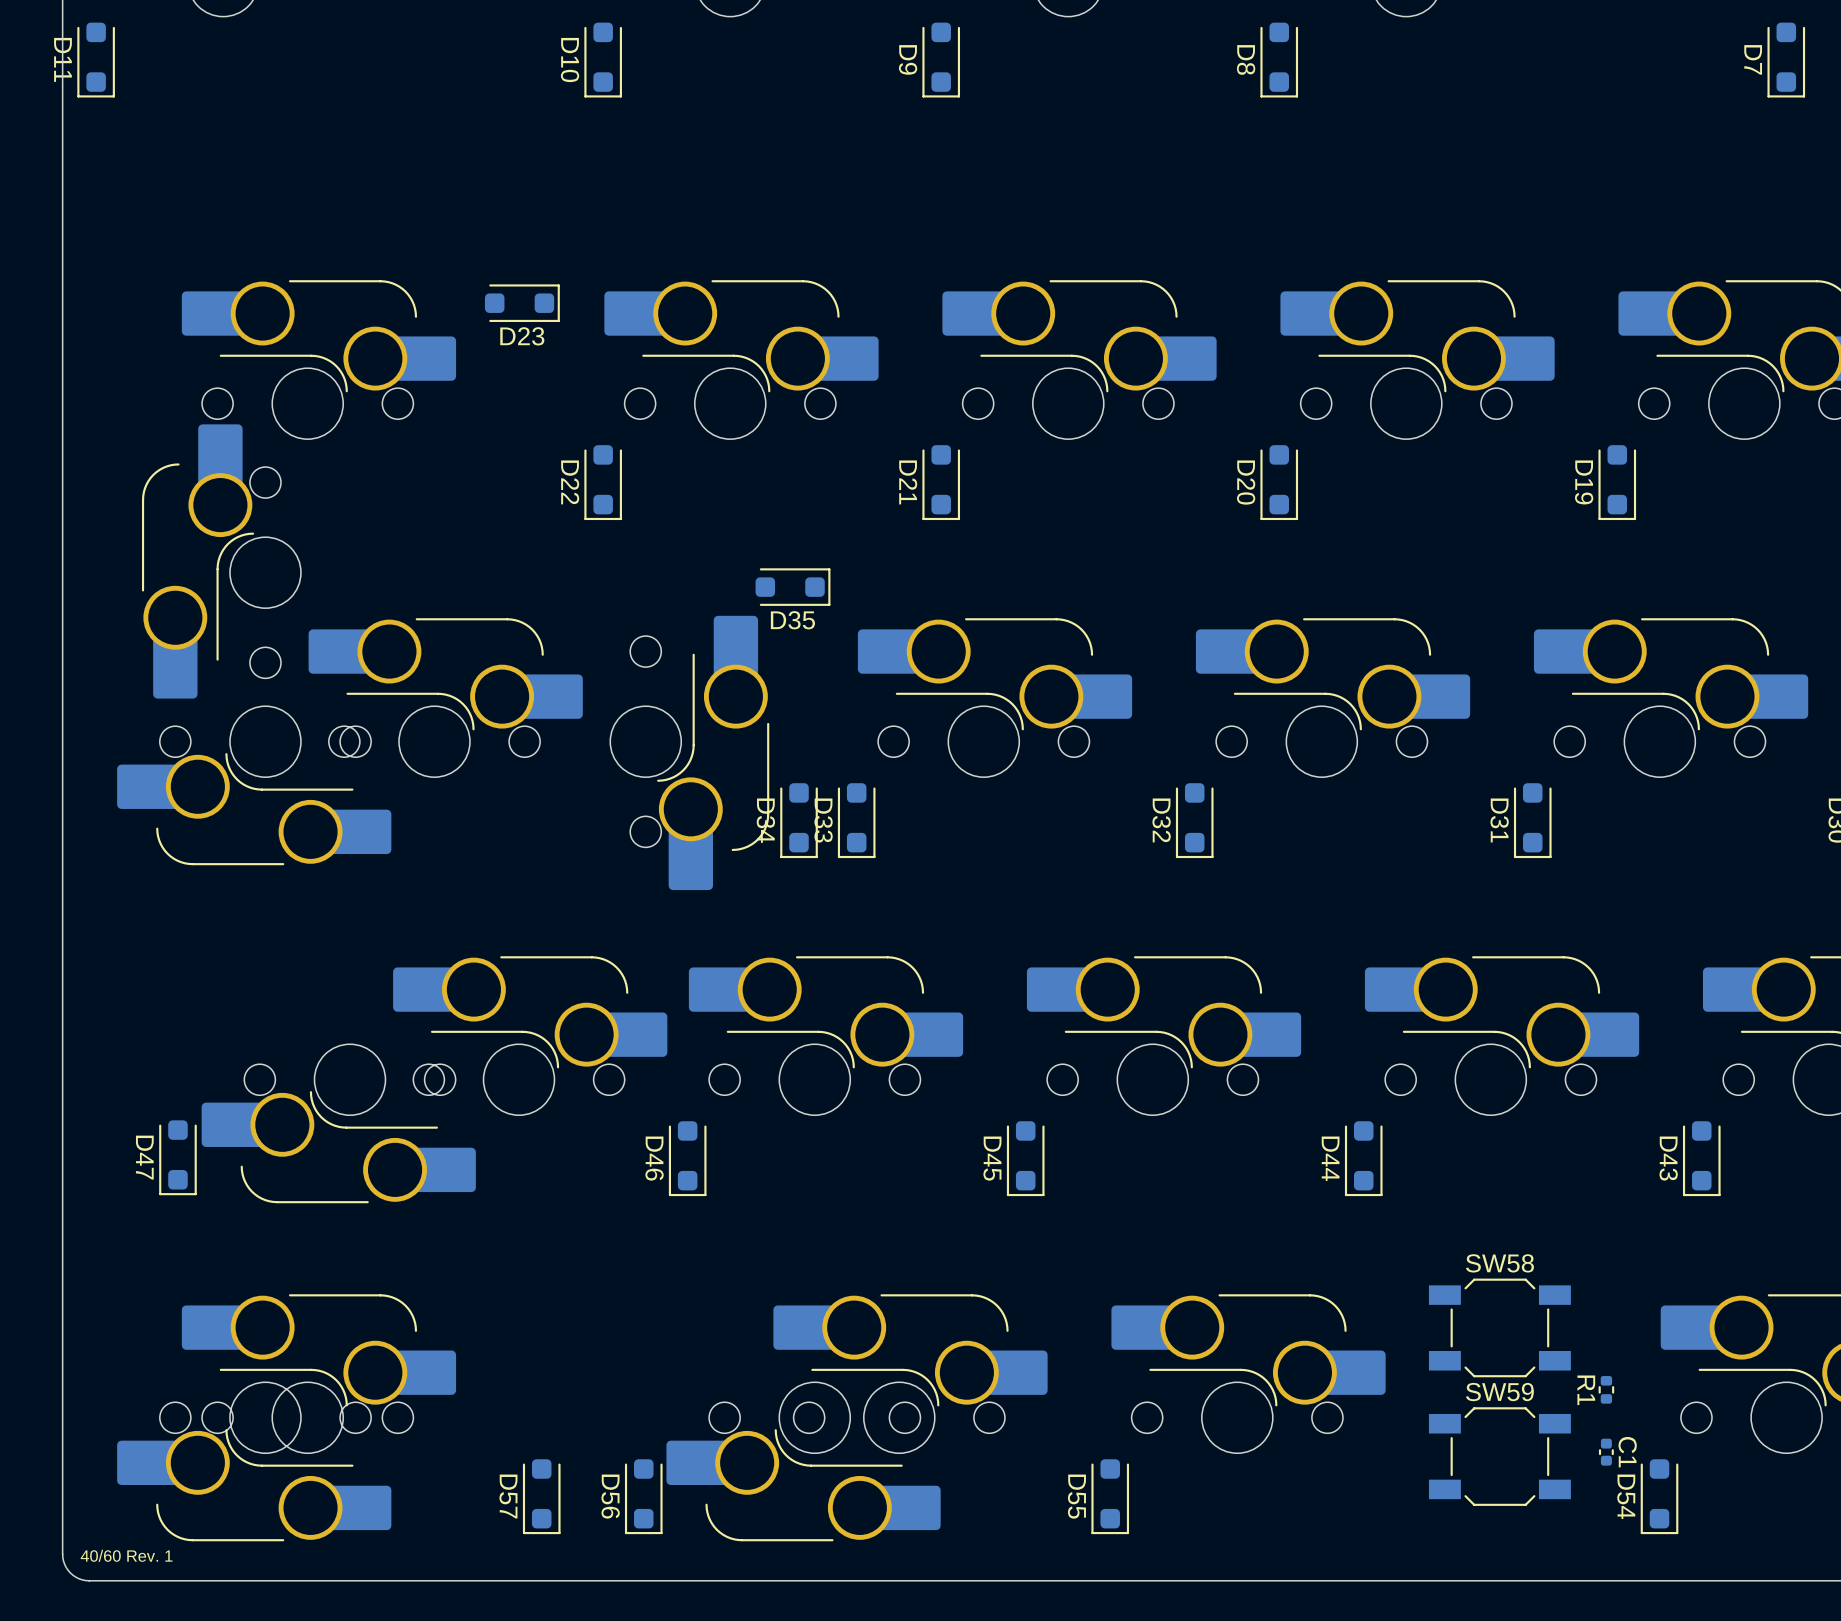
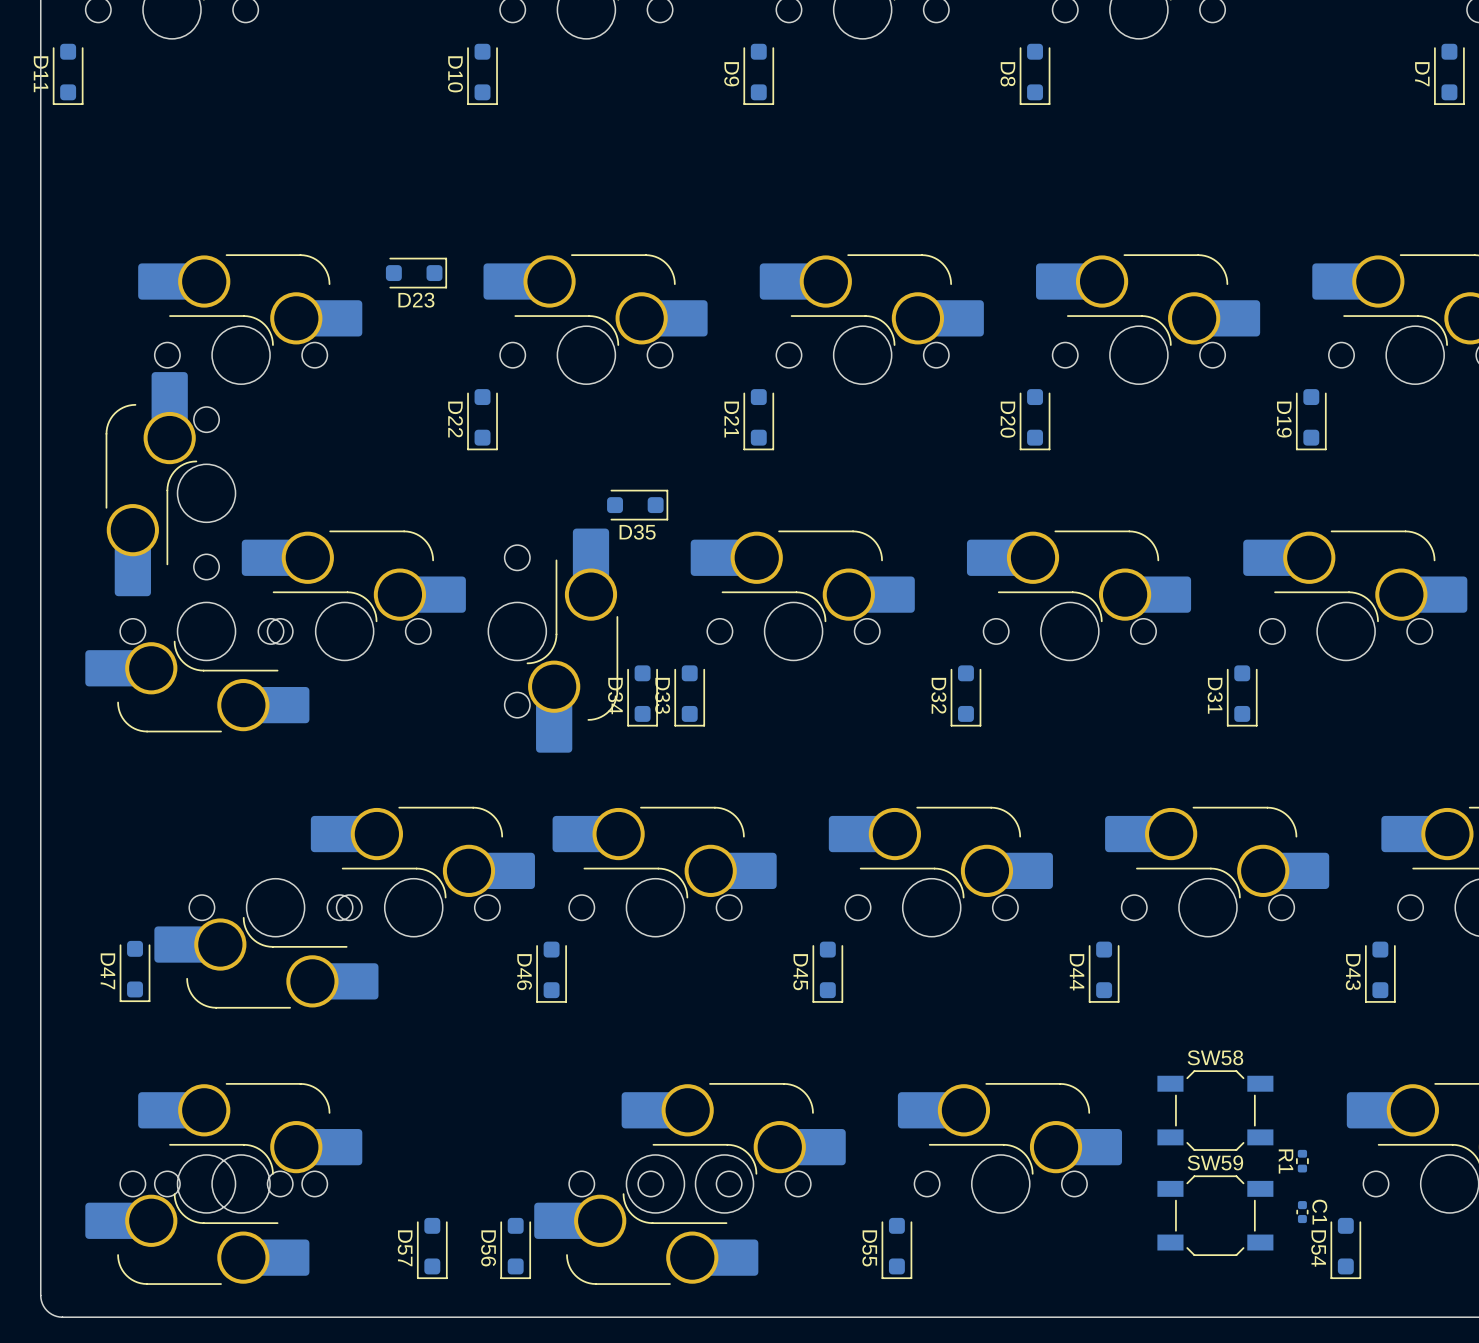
text: 40/60 Rev. 1 (126, 1555) -> none

